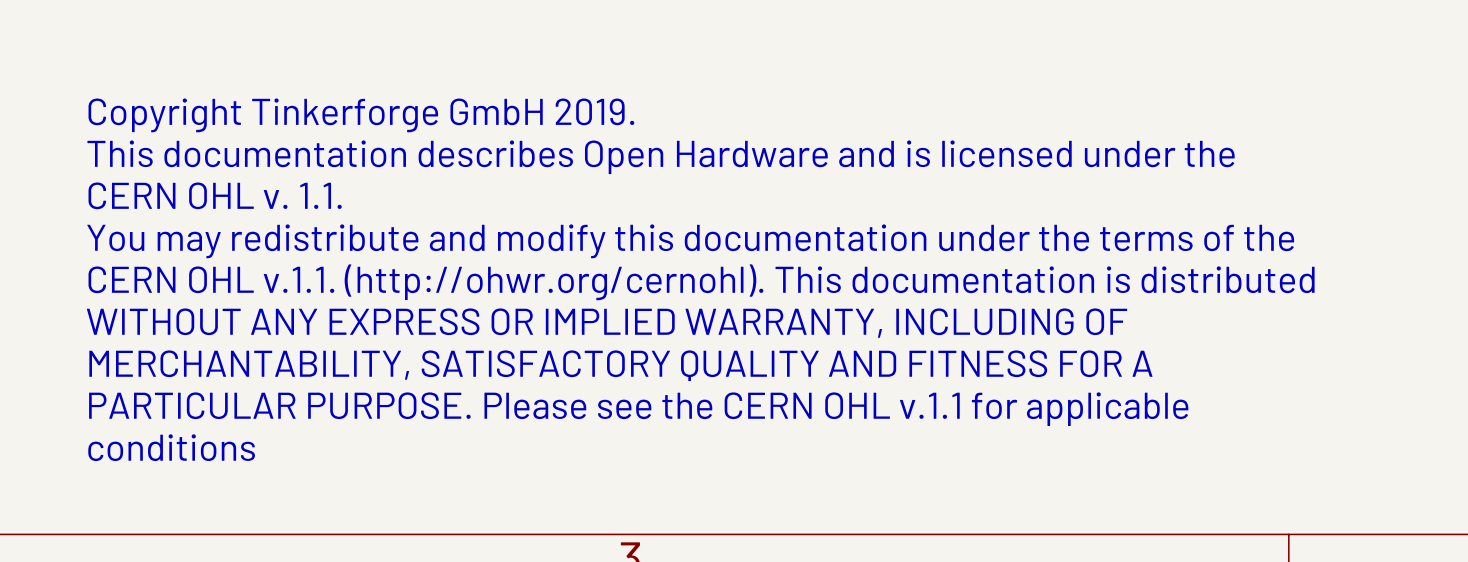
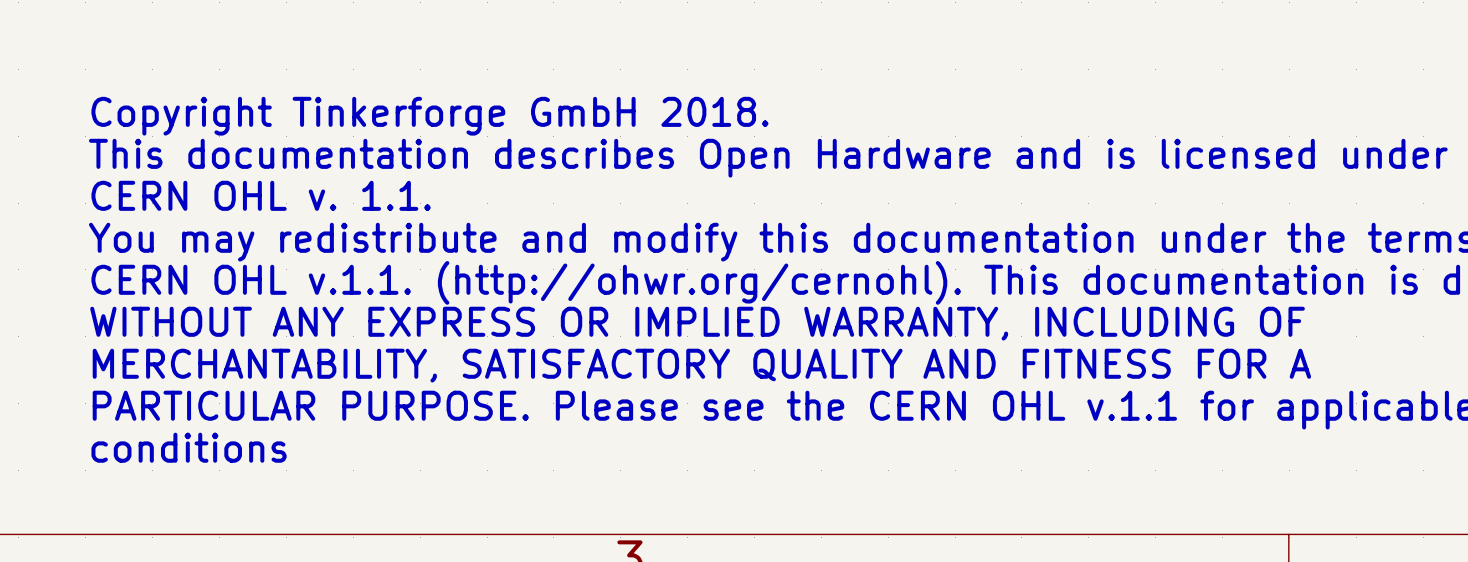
text: Copyright Tinkerforge GmbH 2019. (361, 115) -> Copyright Tinkerforge GmbH 2018. (429, 116)

